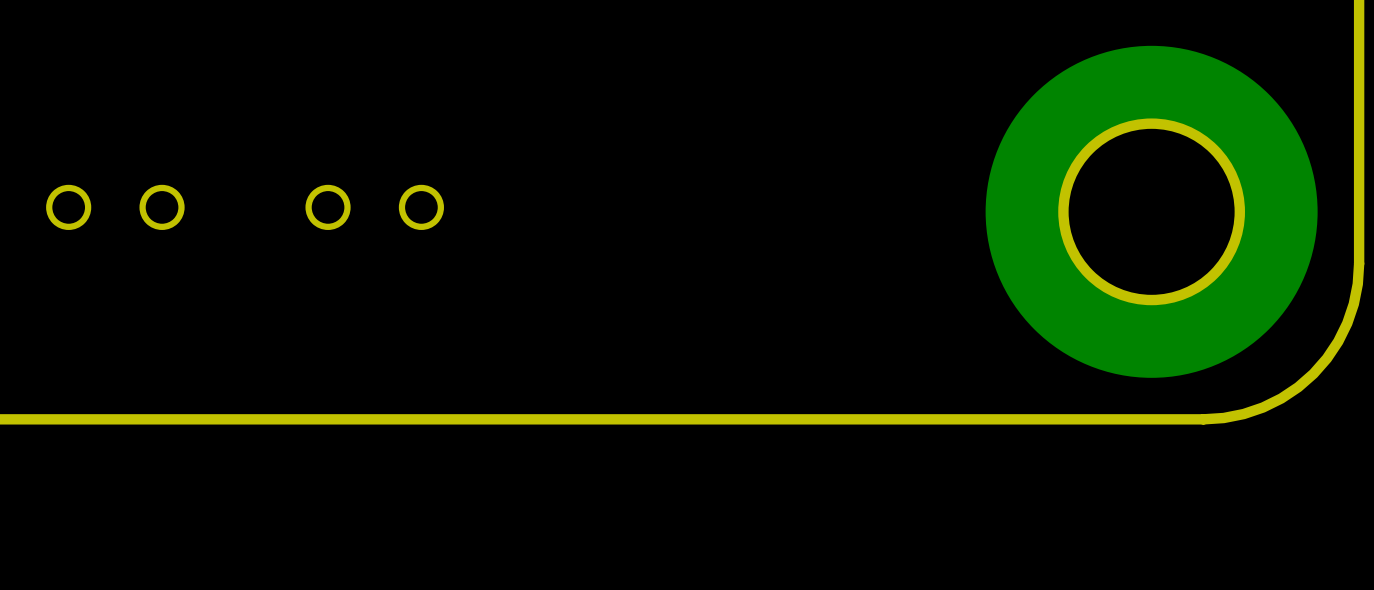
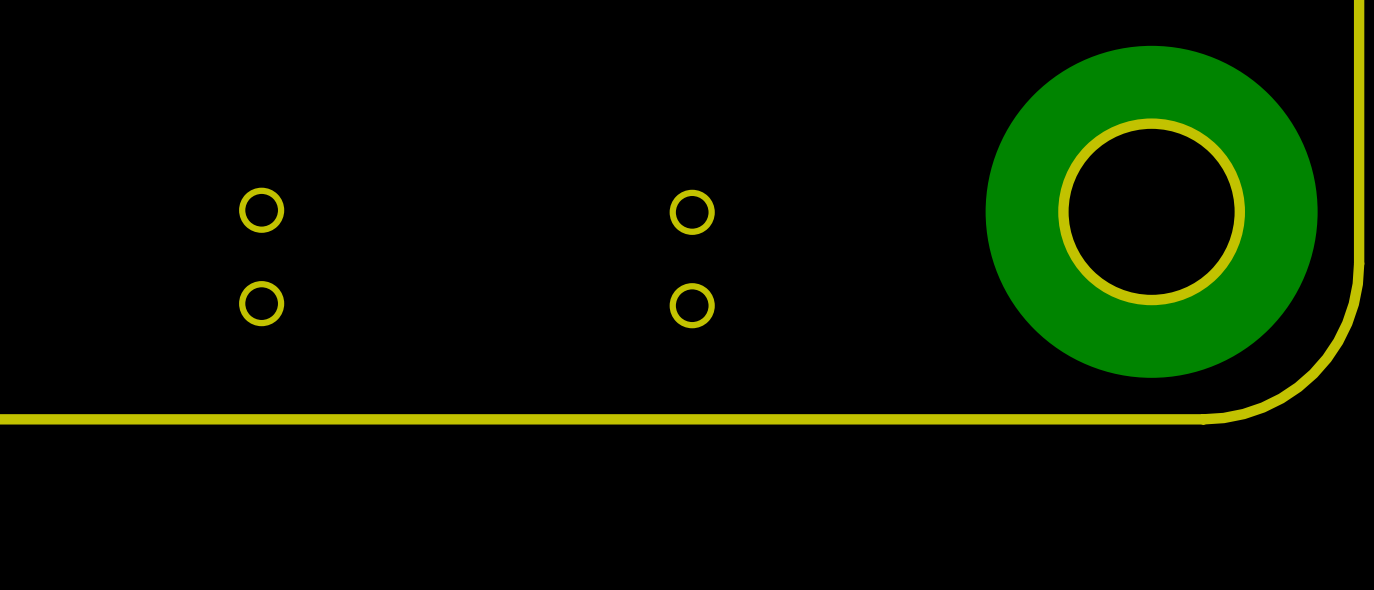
part: (115, 207) -> none
part: (374, 207) -> none
part: none -> (261, 256)
part: none -> (692, 259)

